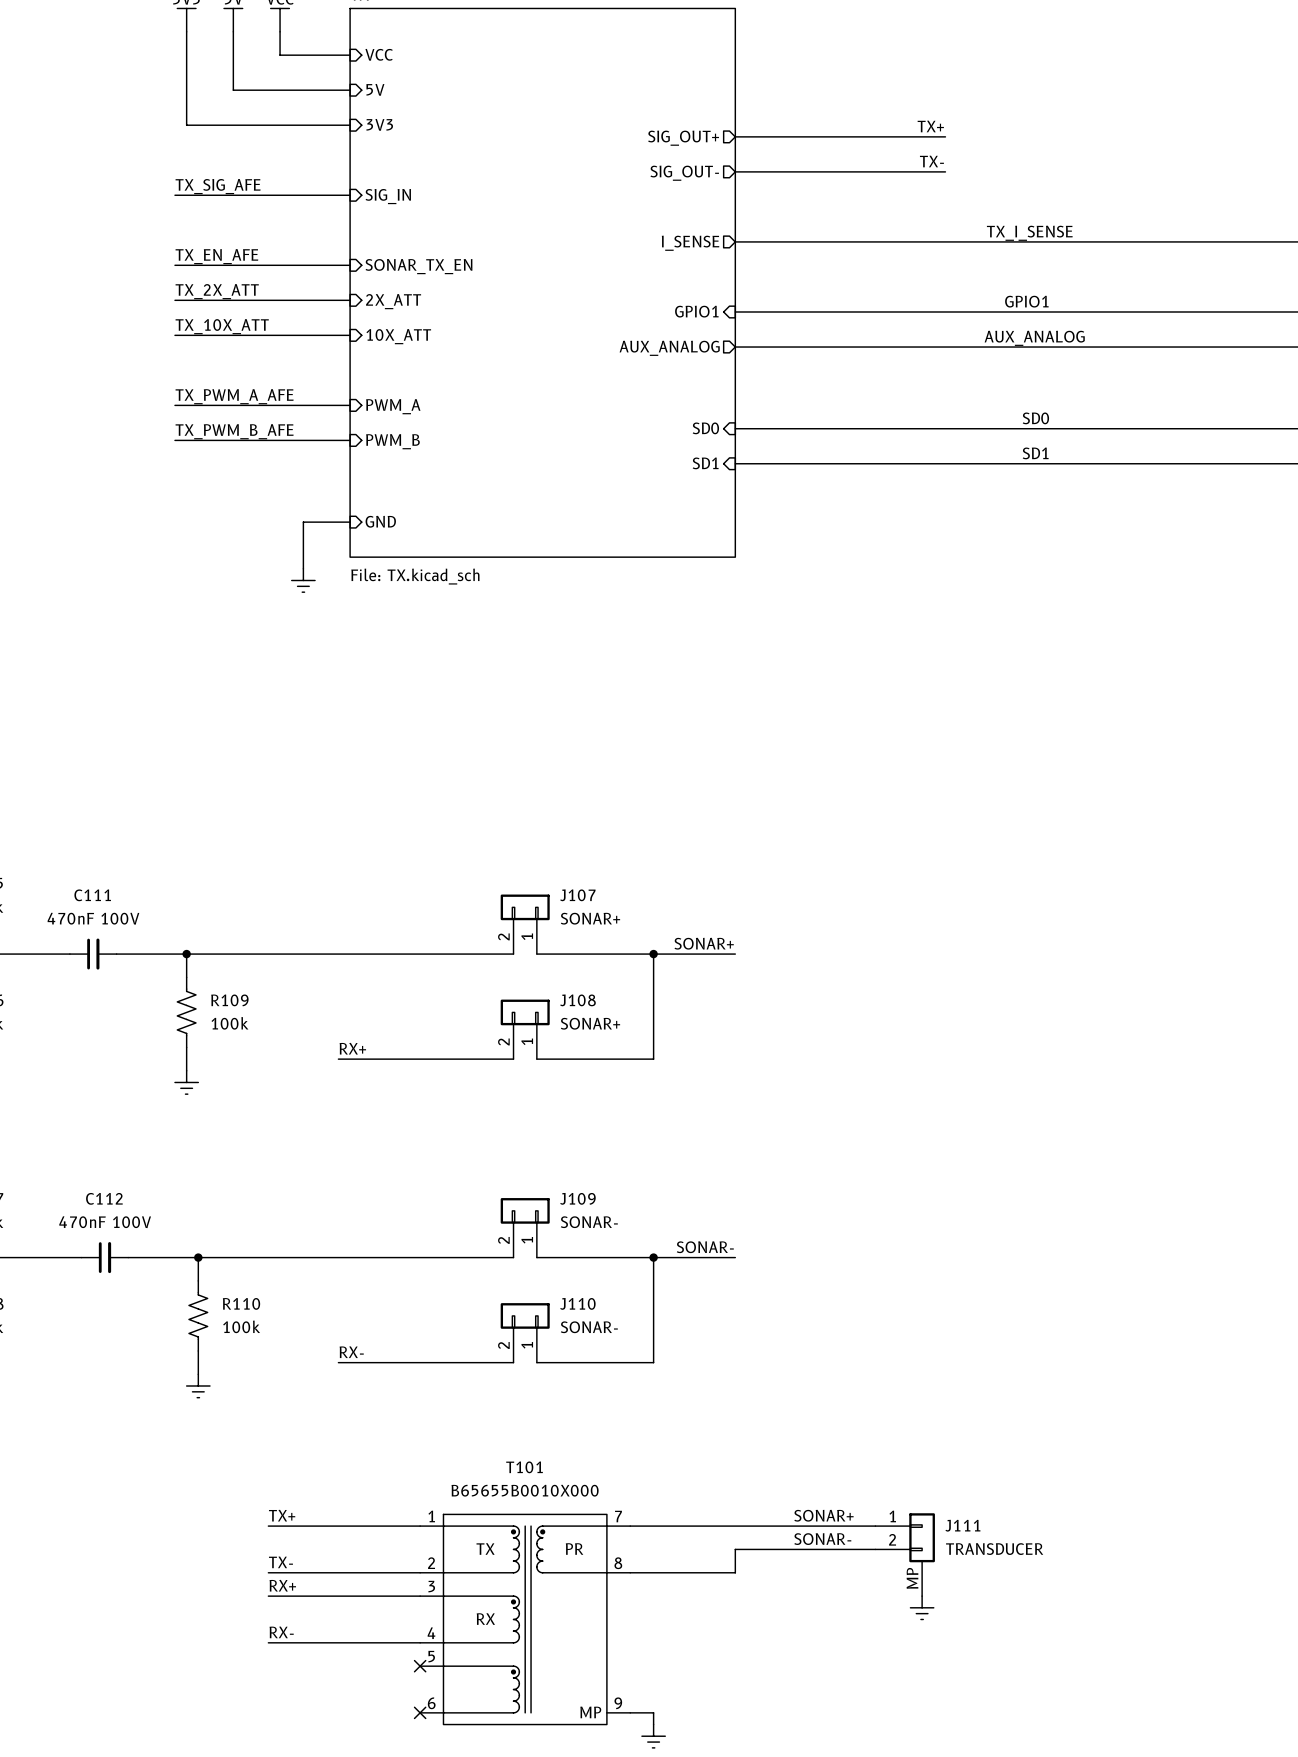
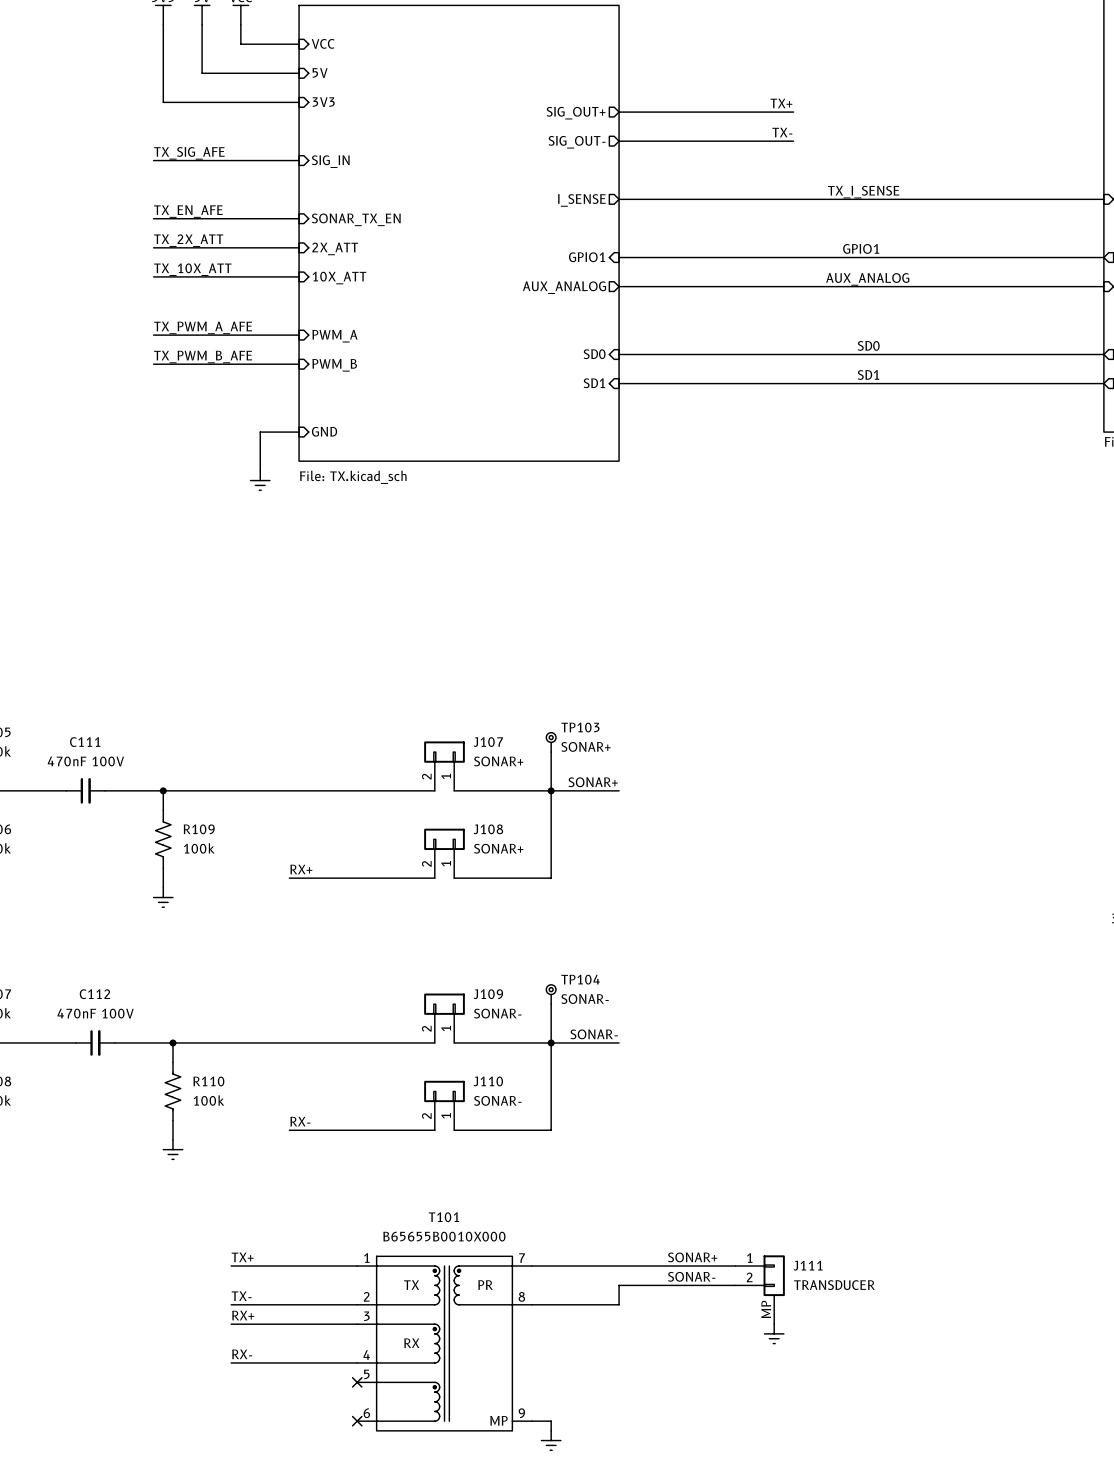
TP103: none -> SONAR+ (551, 742)
wire: none -> (551, 752) (551, 790)
TP104: none -> SONAR- (551, 994)
wire: none -> (551, 1004) (551, 1042)

